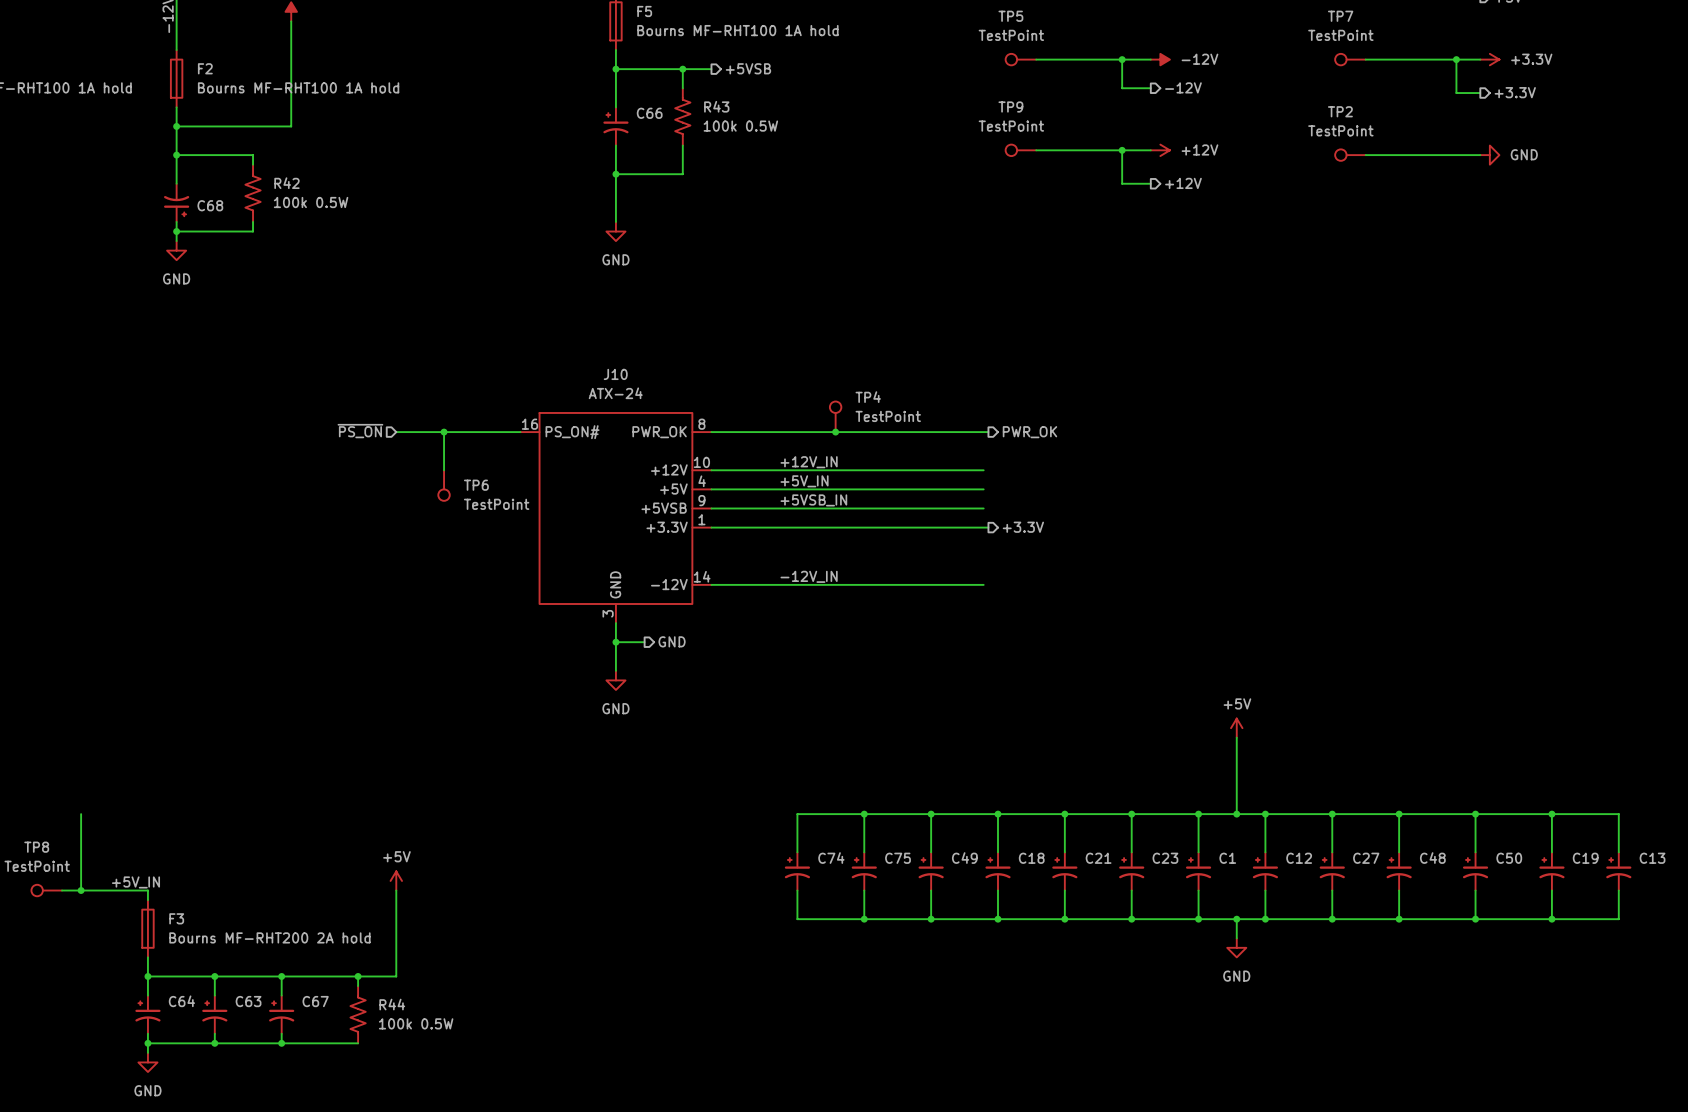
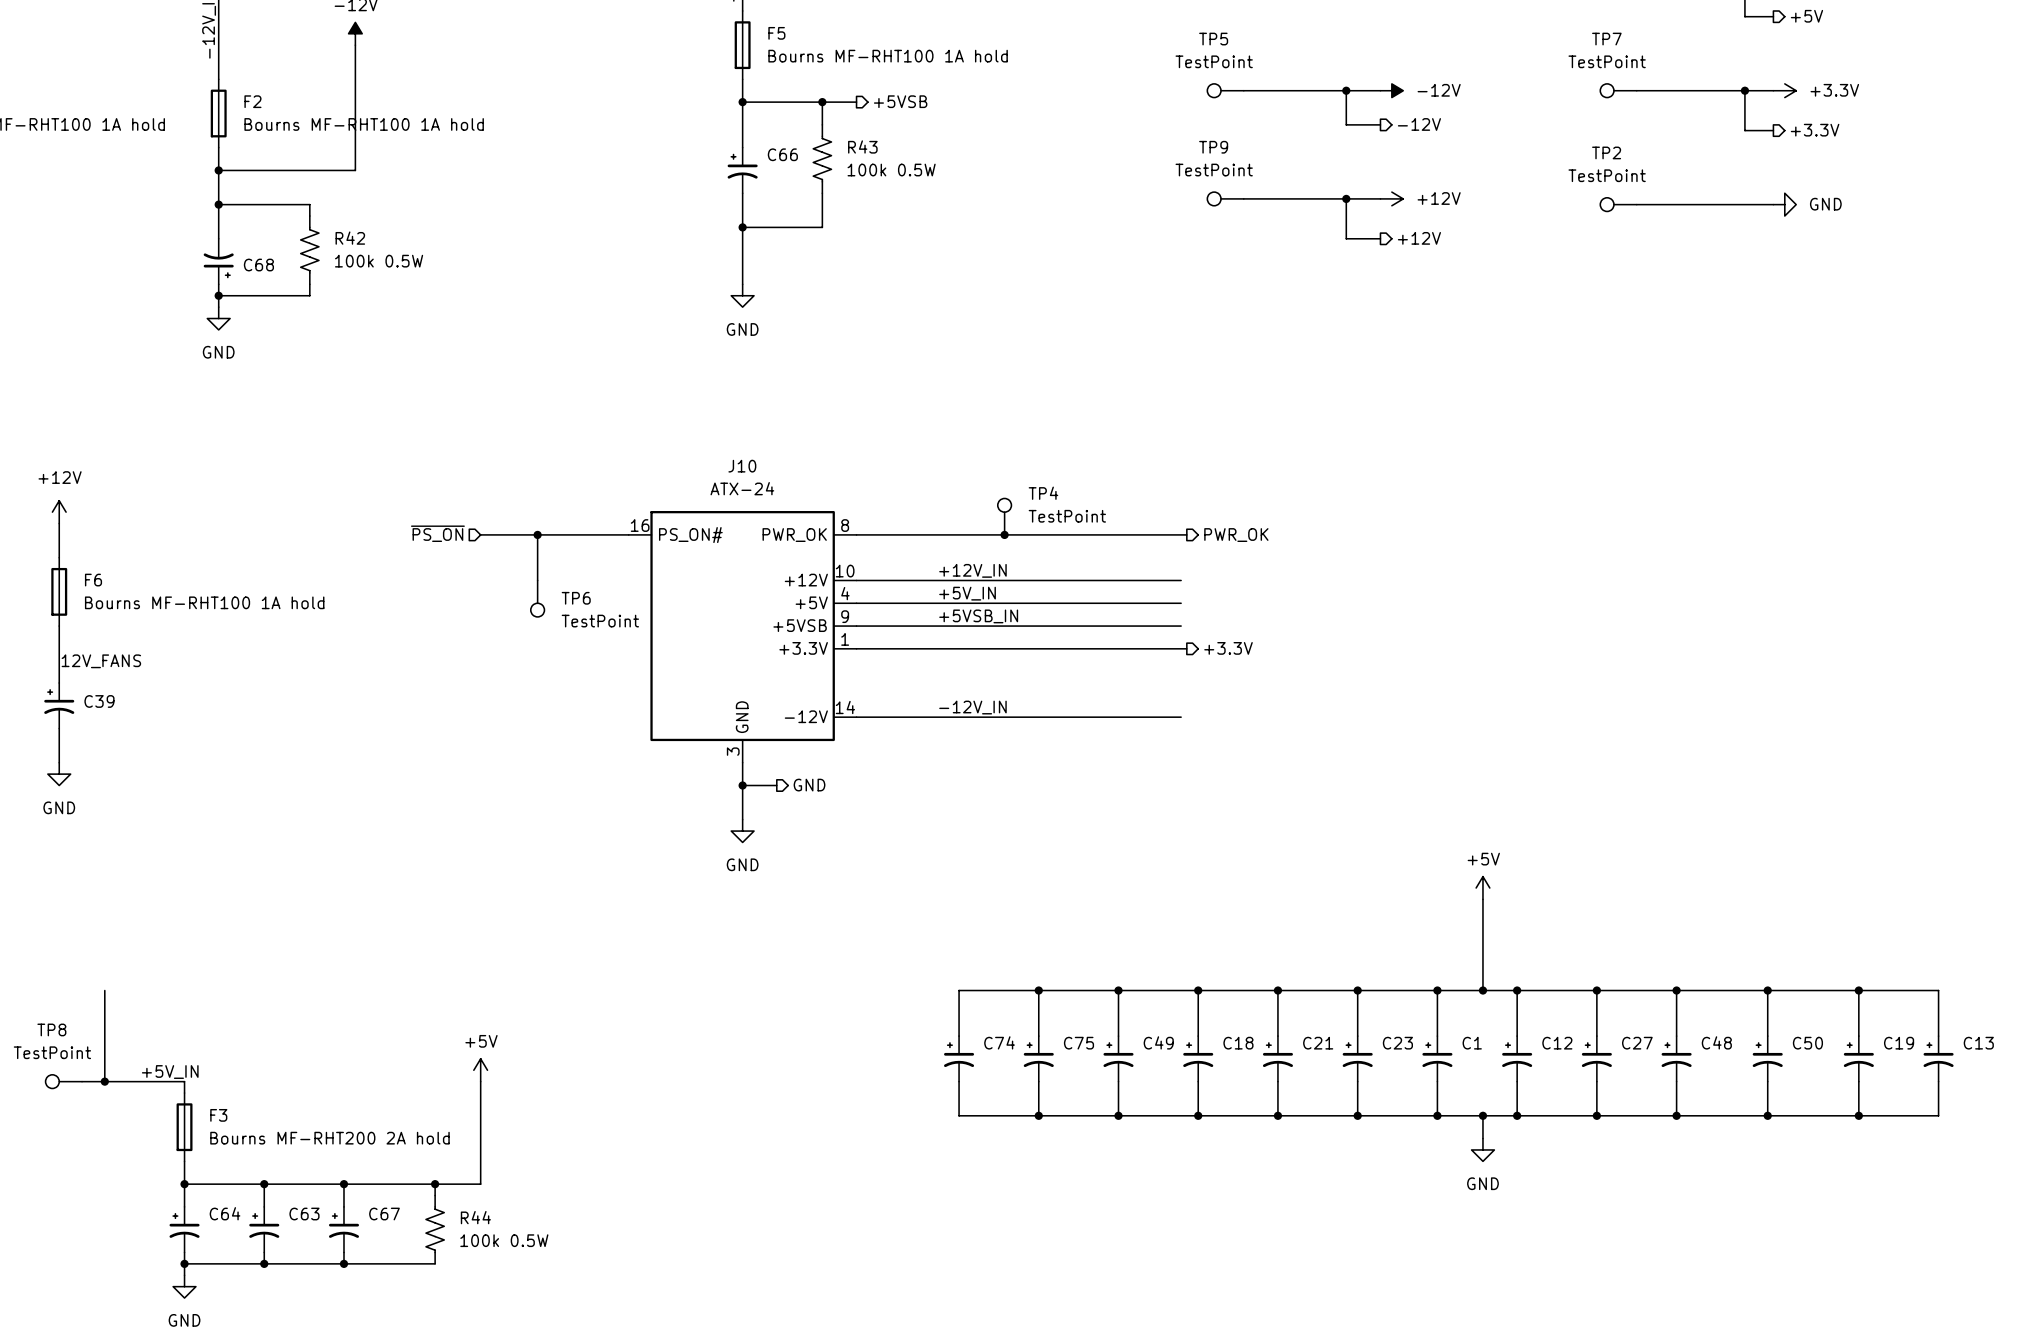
power symbol: none -> +12V (59, 512)
wire: none -> (59, 523) (59, 557)
F6: none -> Bourns MF-RHT100 1A hold (59, 591)
wire: none -> (59, 626) (59, 682)
label: none -> 12V_FANS (101, 661)
C39: none -> (59, 705)
wire: none -> (59, 728) (59, 762)
power symbol: none -> GND (59, 774)

